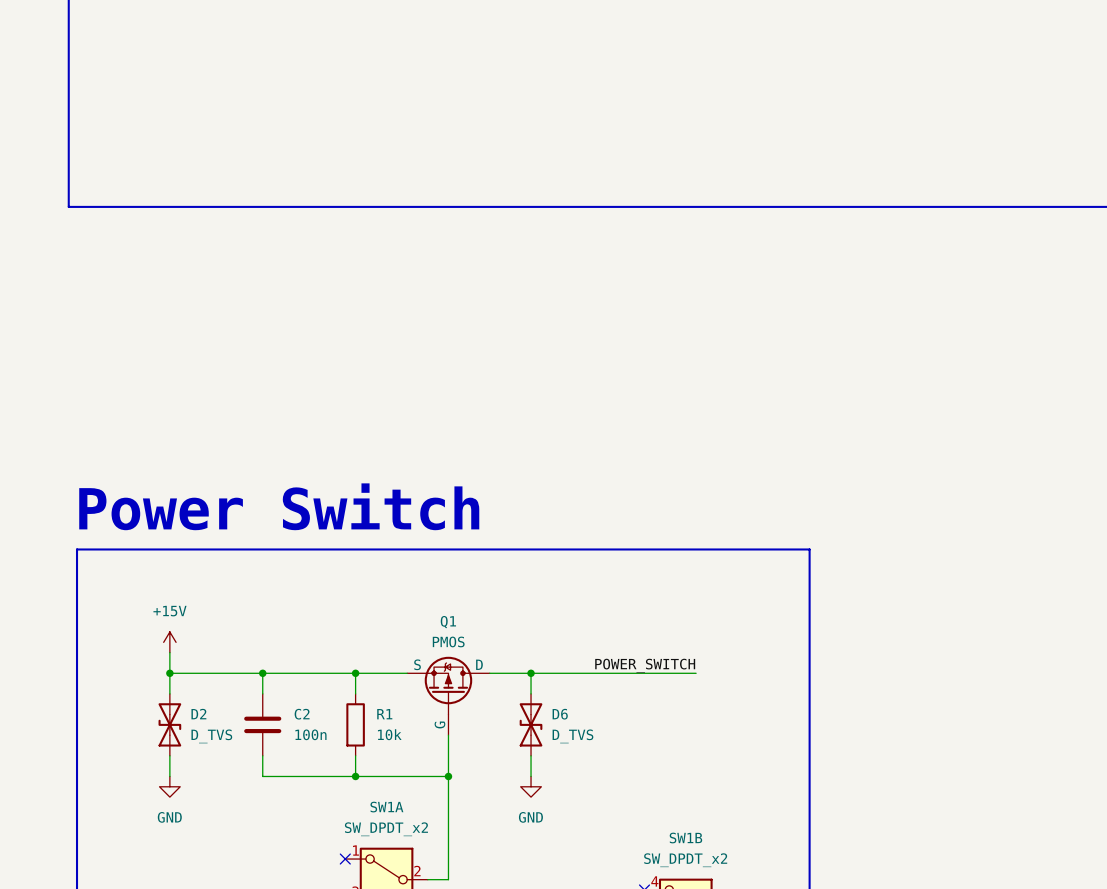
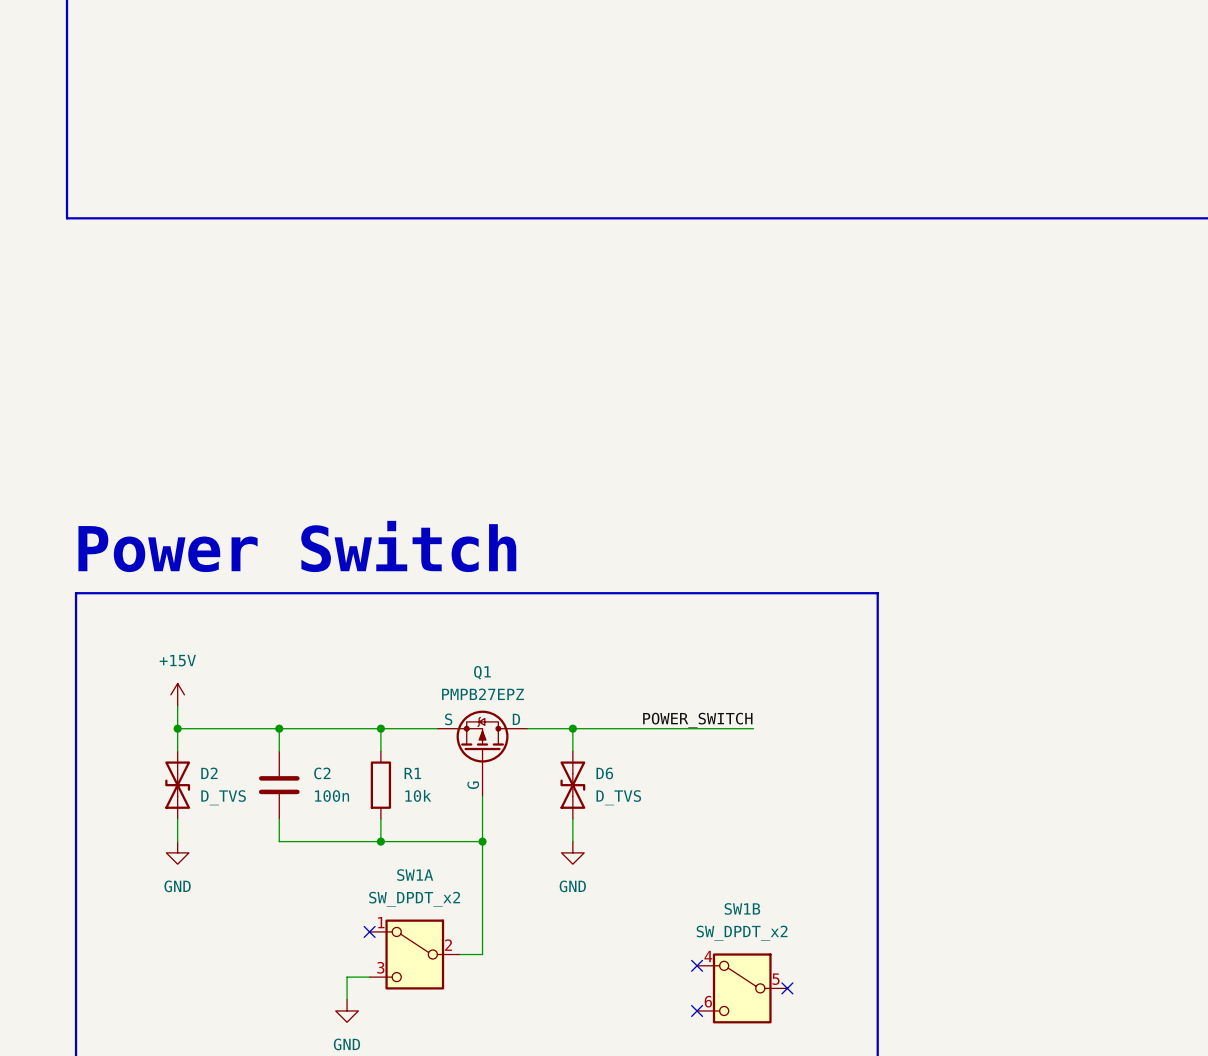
Q1 value: PMOS (448, 641) -> PMPB27EPZ (483, 694)

